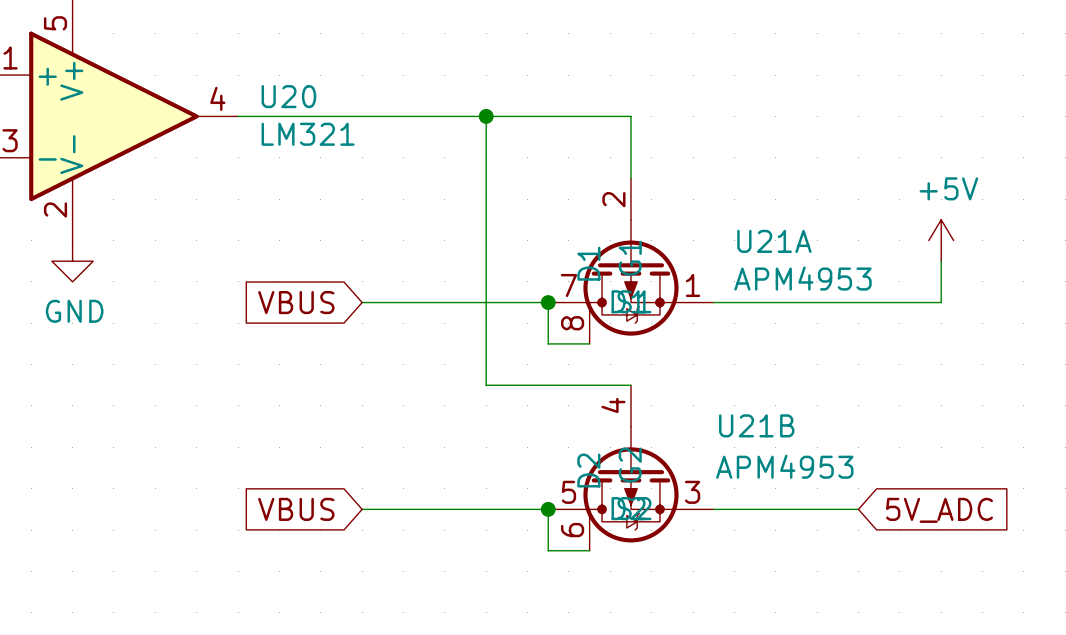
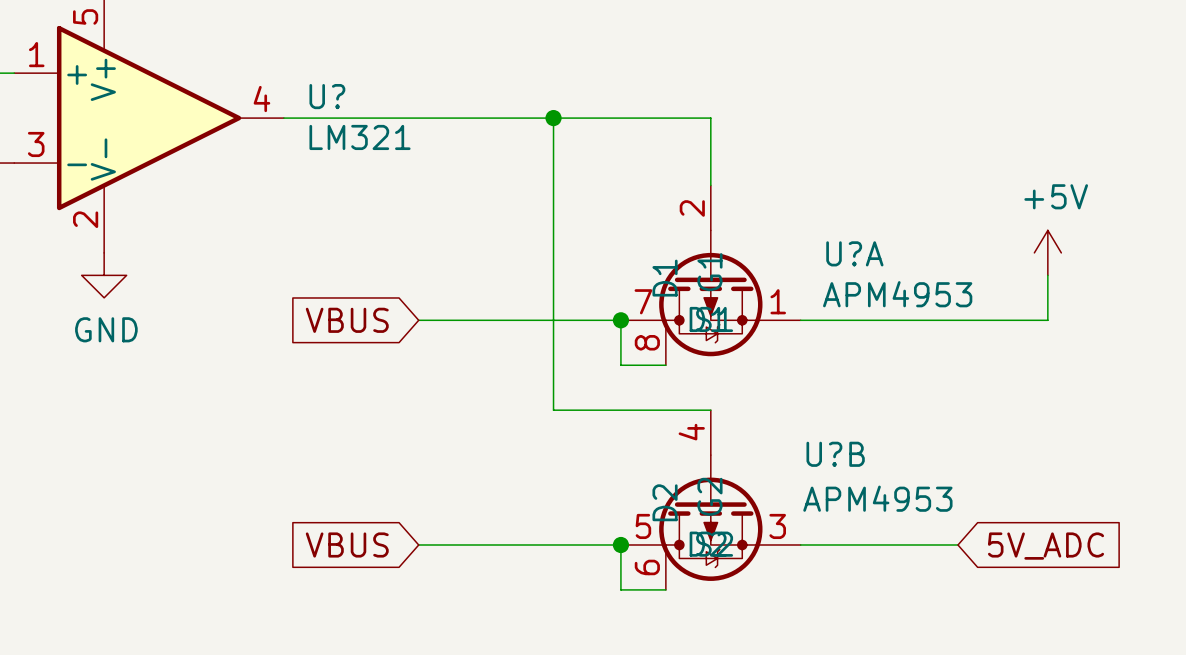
U20 name: U20 (288, 96) -> U? (327, 96)
U21A name: U21A (774, 241) -> U?A (854, 253)
U21B name: U21B (756, 425) -> U?B (835, 454)

